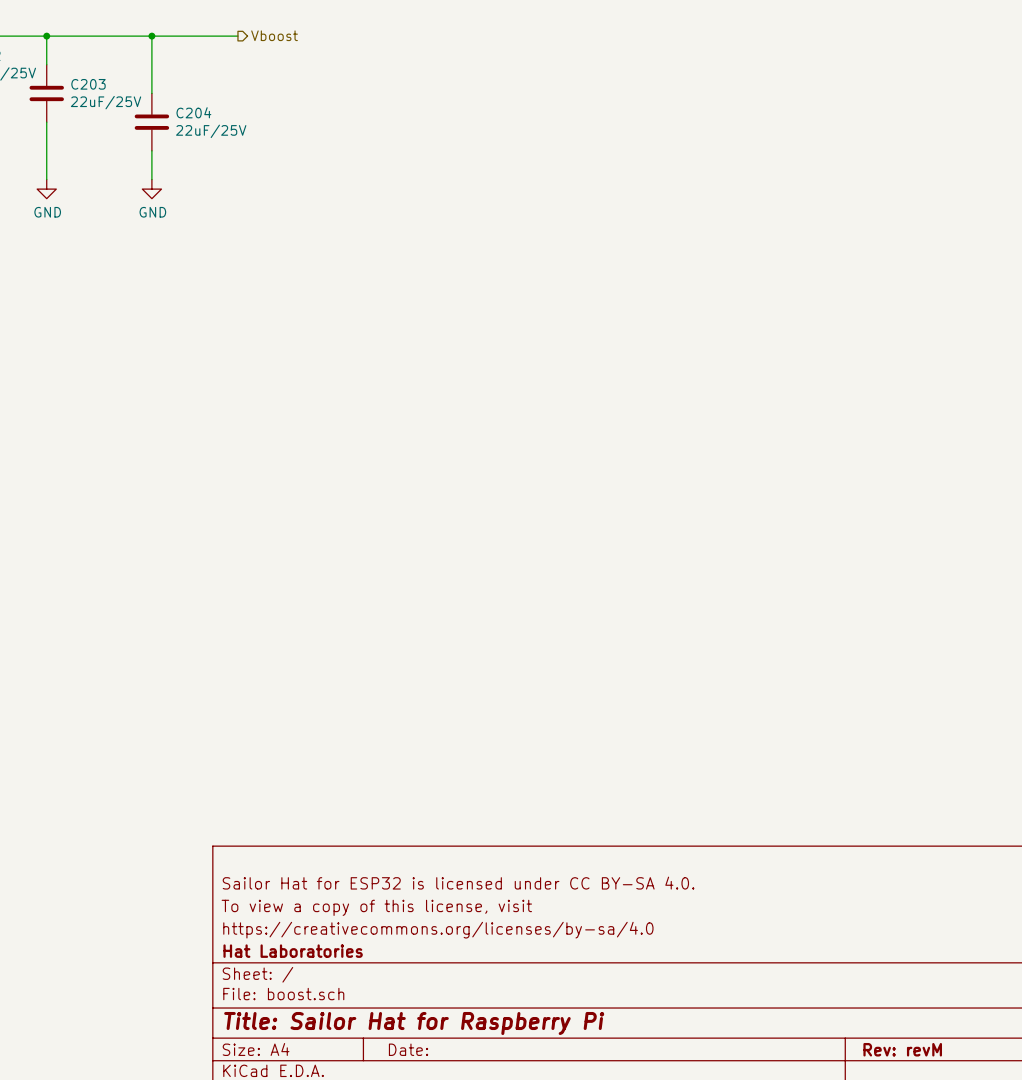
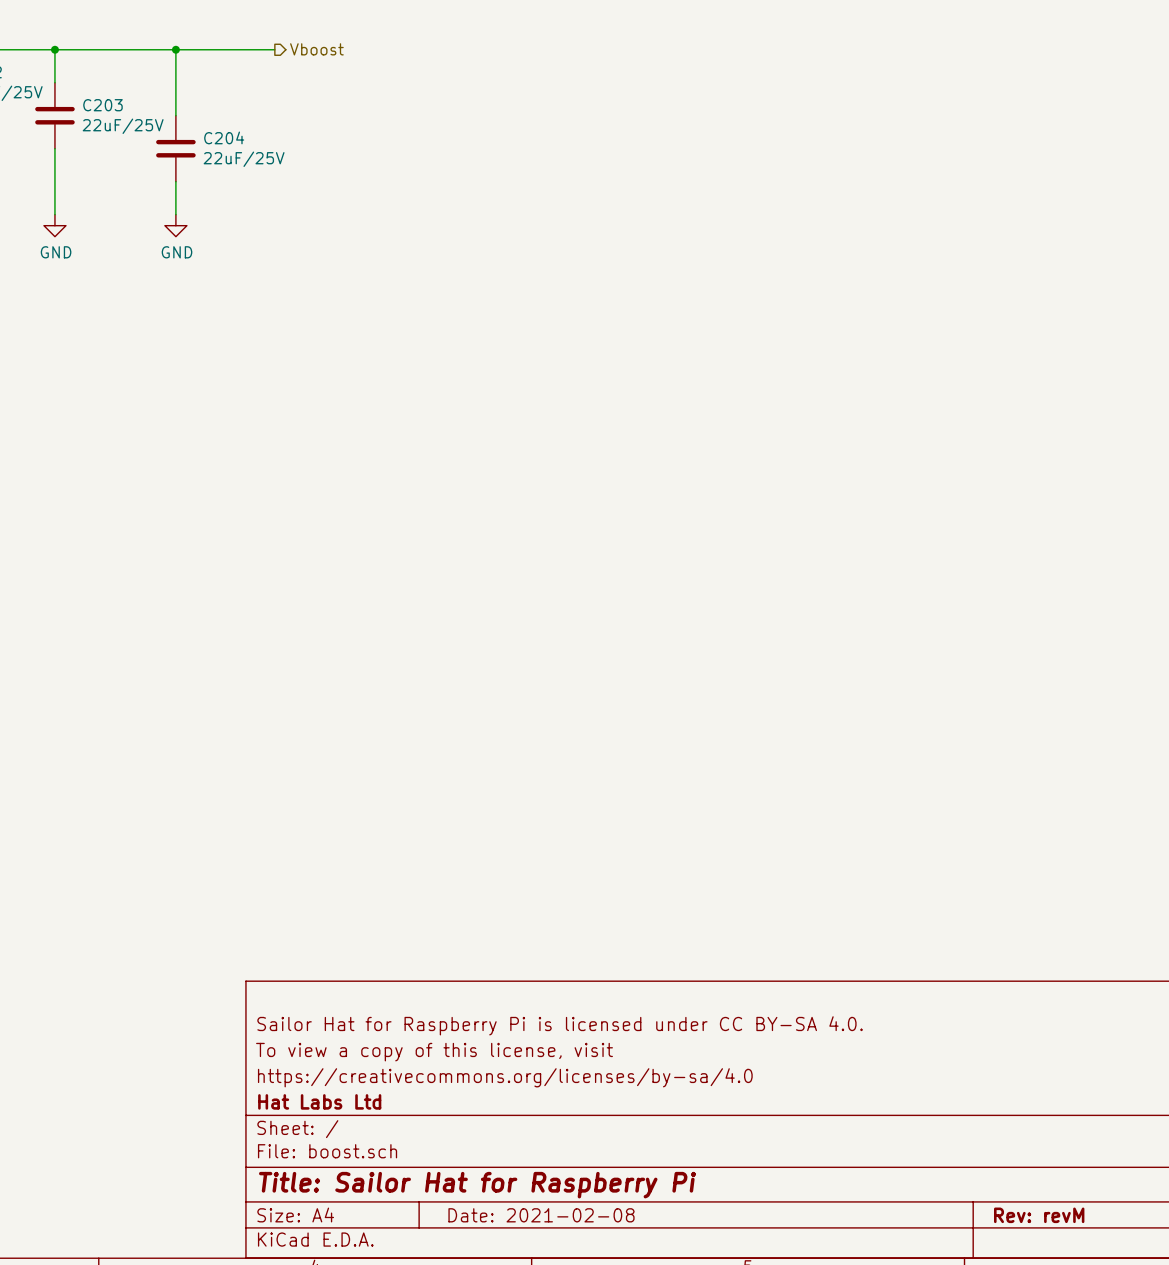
title block: Sailor Hat for ESP32 is licensed under CC BY-SA 4.0. (458, 883) -> Sailor Hat for Raspberry Pi is licensed under CC BY-SA 4.0. (560, 1025)
title block: Hat Laboratories (293, 951) -> Hat Labs Ltd (319, 1101)
title block: Date: (408, 1049) -> Date: 2021-02-08 (541, 1215)

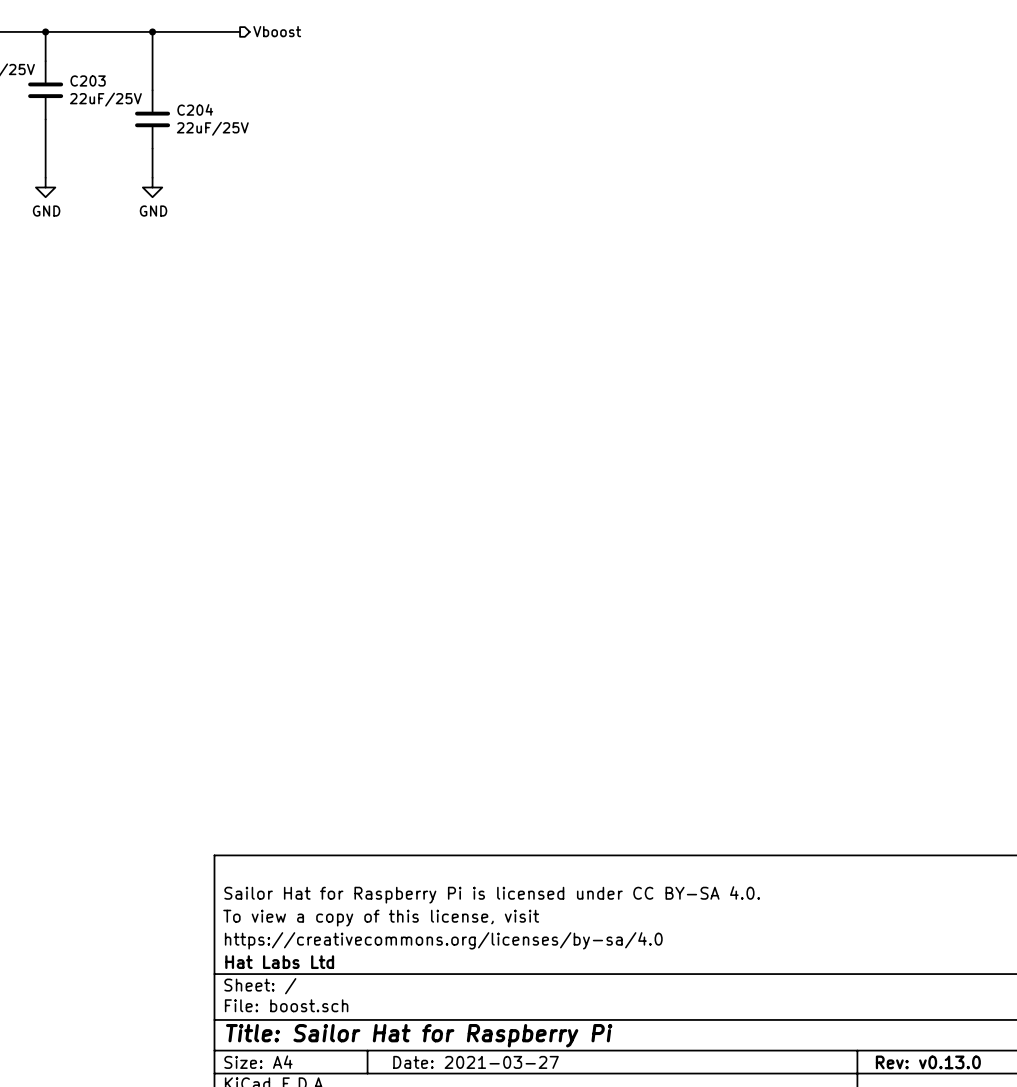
title block: Date: 2021-02-08 (541, 1215) -> Date: 2021-03-27 (476, 1062)
title block: Rev: revM (1039, 1215) -> Rev: v0.13.0 (928, 1062)

